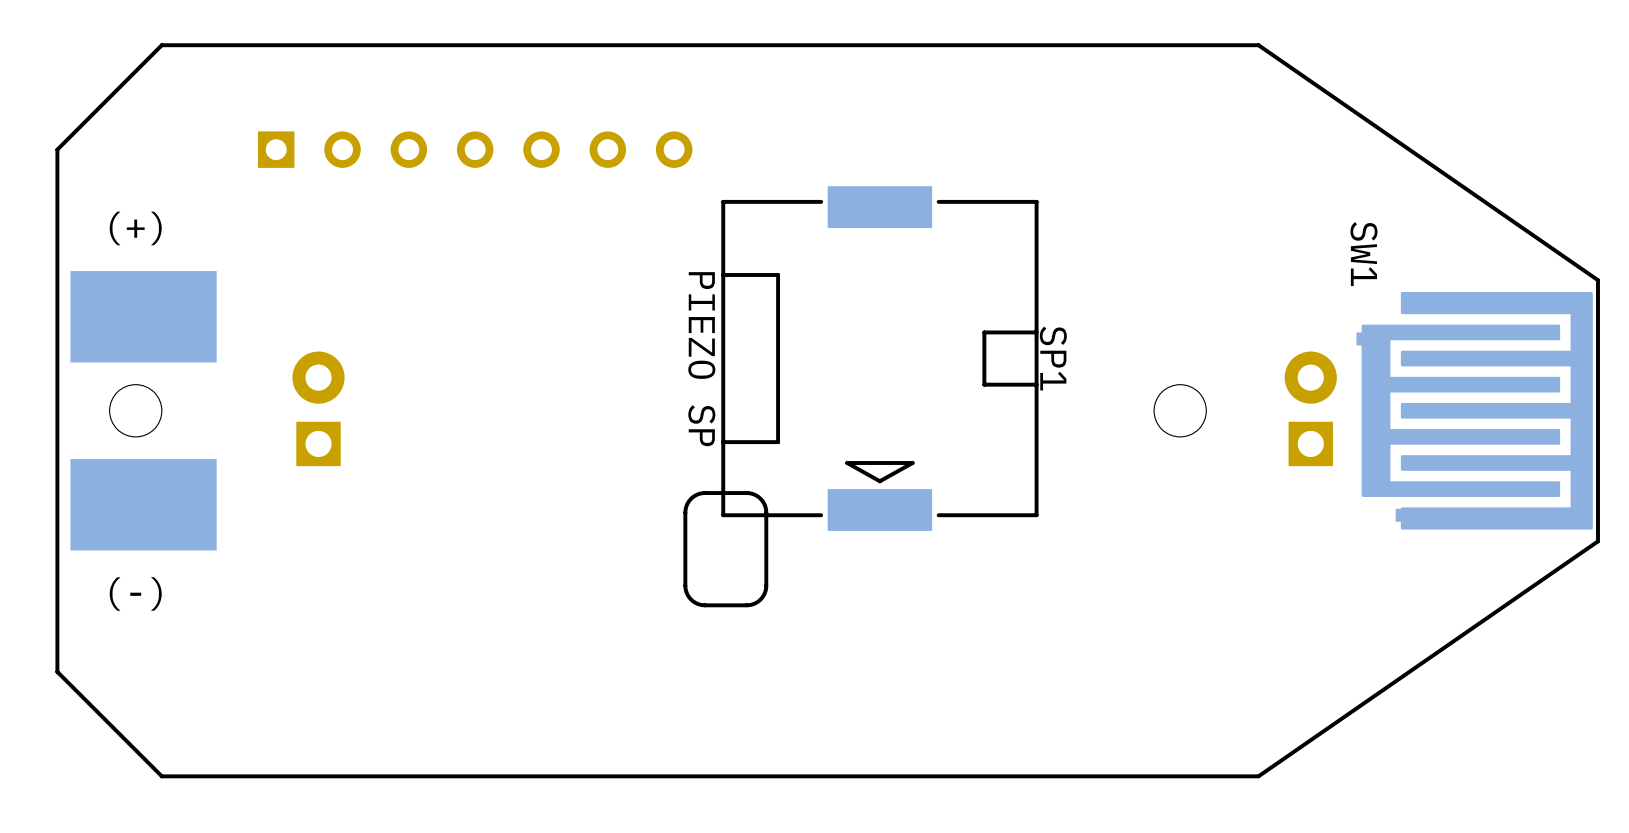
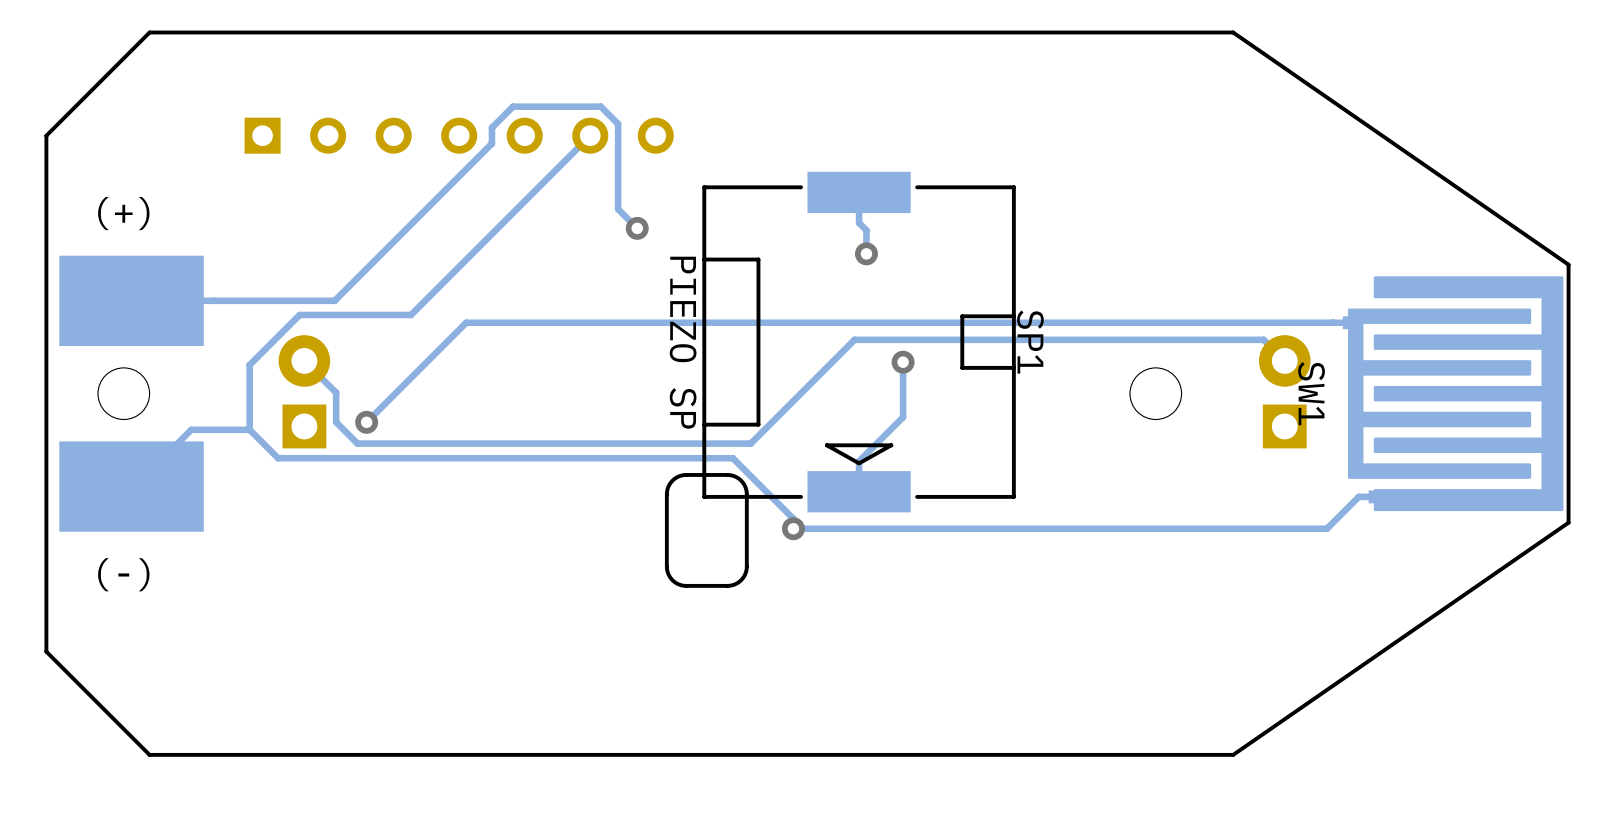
track: none -> (590, 135) (410, 314) (299, 314) (249, 364) (249, 429)
track: none -> (859, 192) (859, 222) (866, 230) (866, 253)
track: none -> (637, 228) (618, 209) (618, 123) (600, 106) (512, 106) (491, 127) (491, 143) (334, 300) (131, 300)
via: none -> (637, 228)
SW1 name position: SW1 (1363, 254) -> SW1 (1311, 393)
via: none -> (866, 253)
SW1 footprint: [1356, 291, 1593, 530] -> [1342, 276, 1564, 512]
track: none -> (1349, 322) (466, 322) (366, 422)
track: none -> (1284, 360) (1263, 339) (854, 339) (750, 443) (357, 443) (336, 422) (336, 392) (304, 360)
track: none -> (903, 362) (903, 417) (859, 461) (859, 491)
via: none -> (903, 362)
via: none -> (366, 422)
track: none -> (249, 429) (191, 429) (134, 486) (131, 486)
track: none -> (249, 429) (278, 458) (732, 458) (793, 518) (793, 528) (1326, 528) (1358, 496) (1375, 496)
via: none -> (793, 528)

